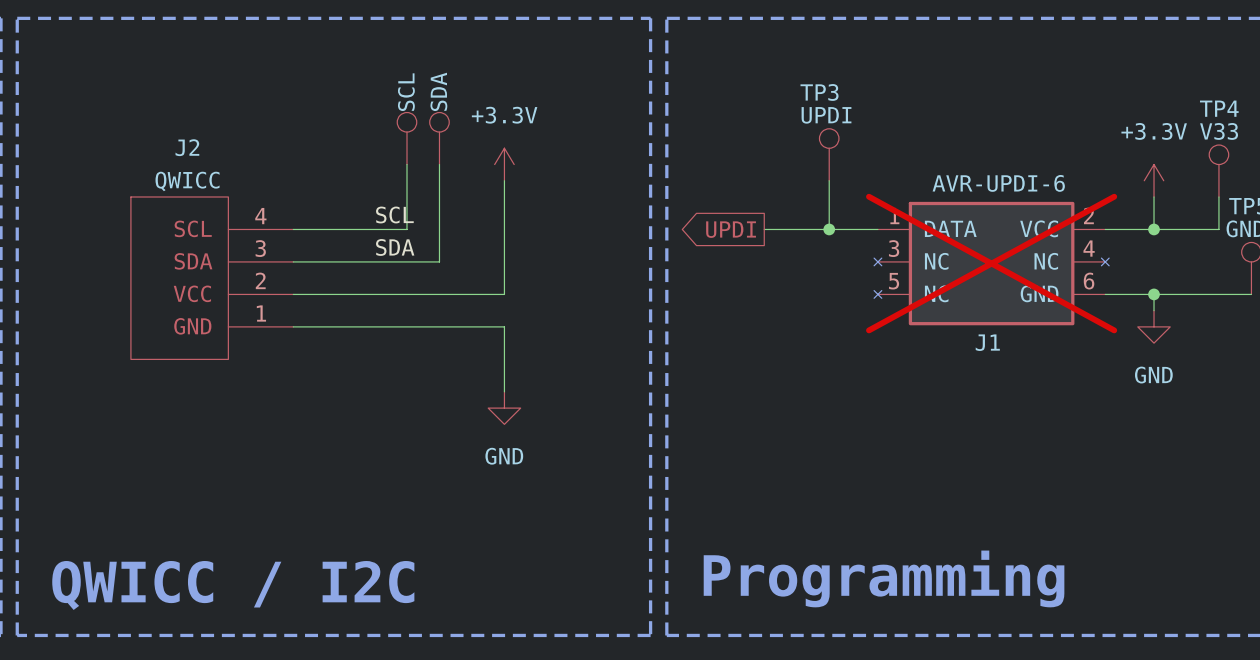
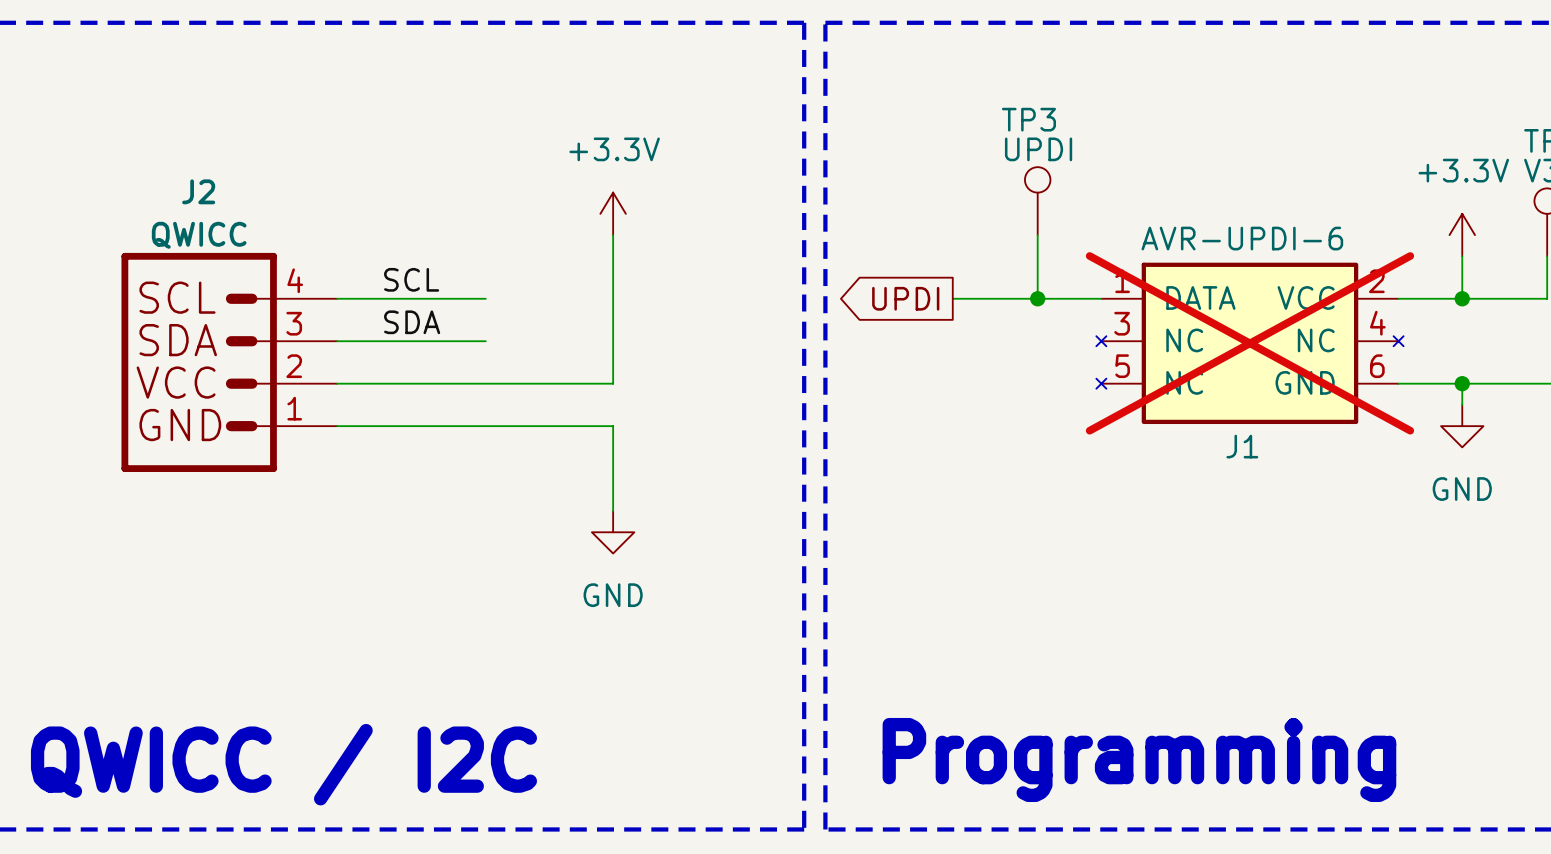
part: SCL (407, 138) -> none
part: SDA (439, 138) -> none
wire: (407, 164) (407, 229) -> none
wire: (439, 164) (439, 261) (407, 261) -> none
J2 symbol: [130, 196, 294, 360] -> [121, 252, 338, 472]
label position: SCL (394, 214) -> SCL (411, 279)
label position: SDA (395, 247) -> SDA (412, 322)

